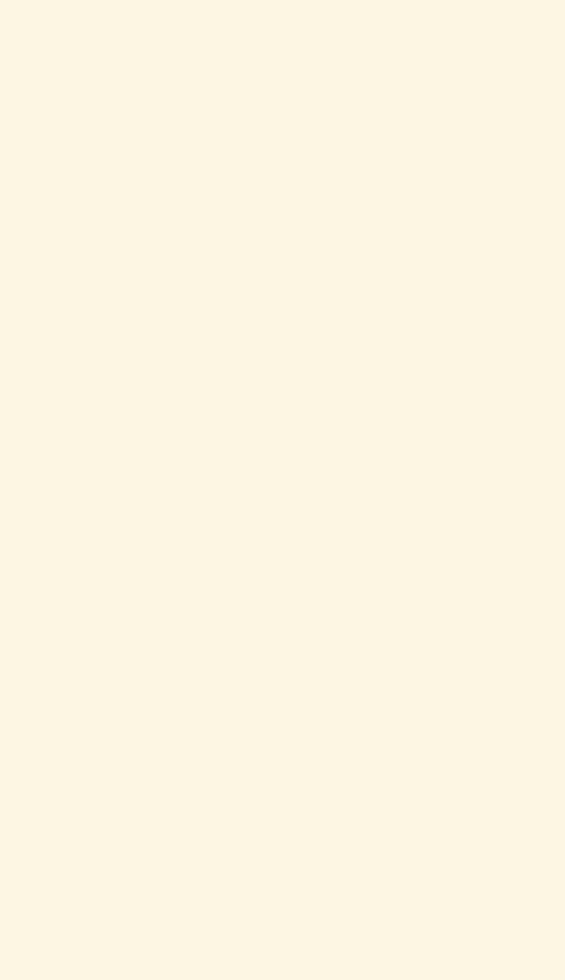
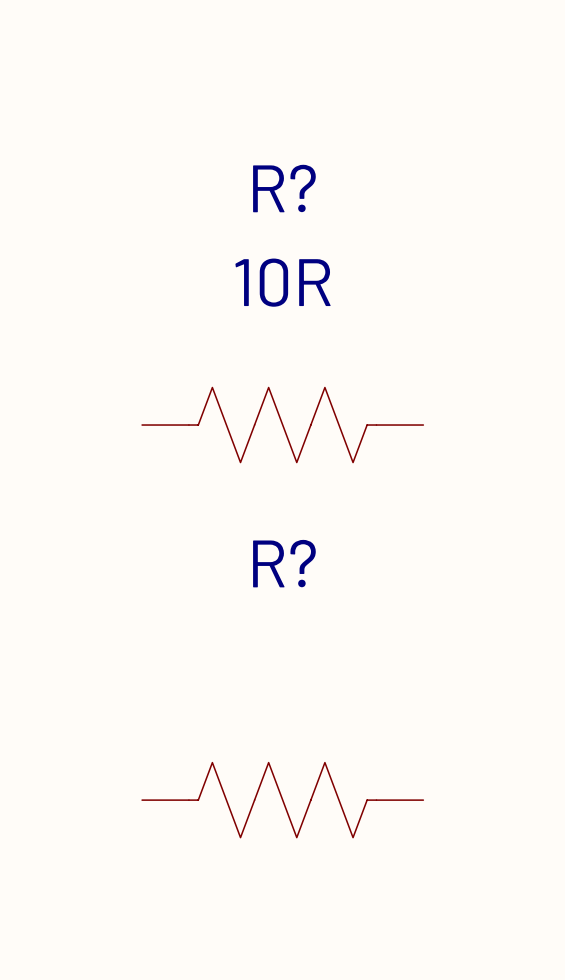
R?: none -> 10R (282, 425)
R?: none -> (282, 800)

